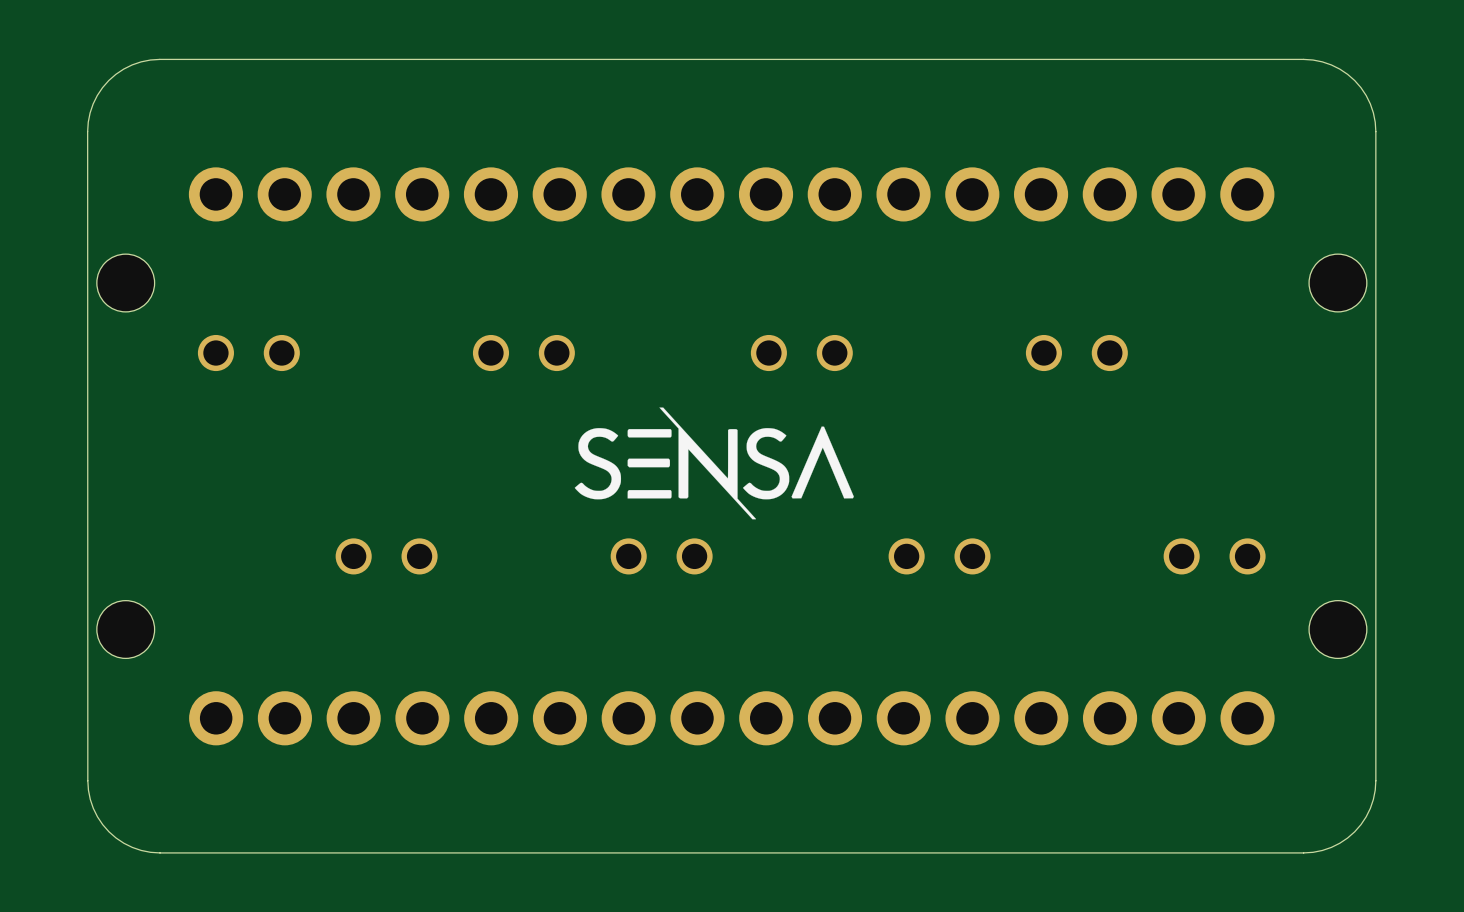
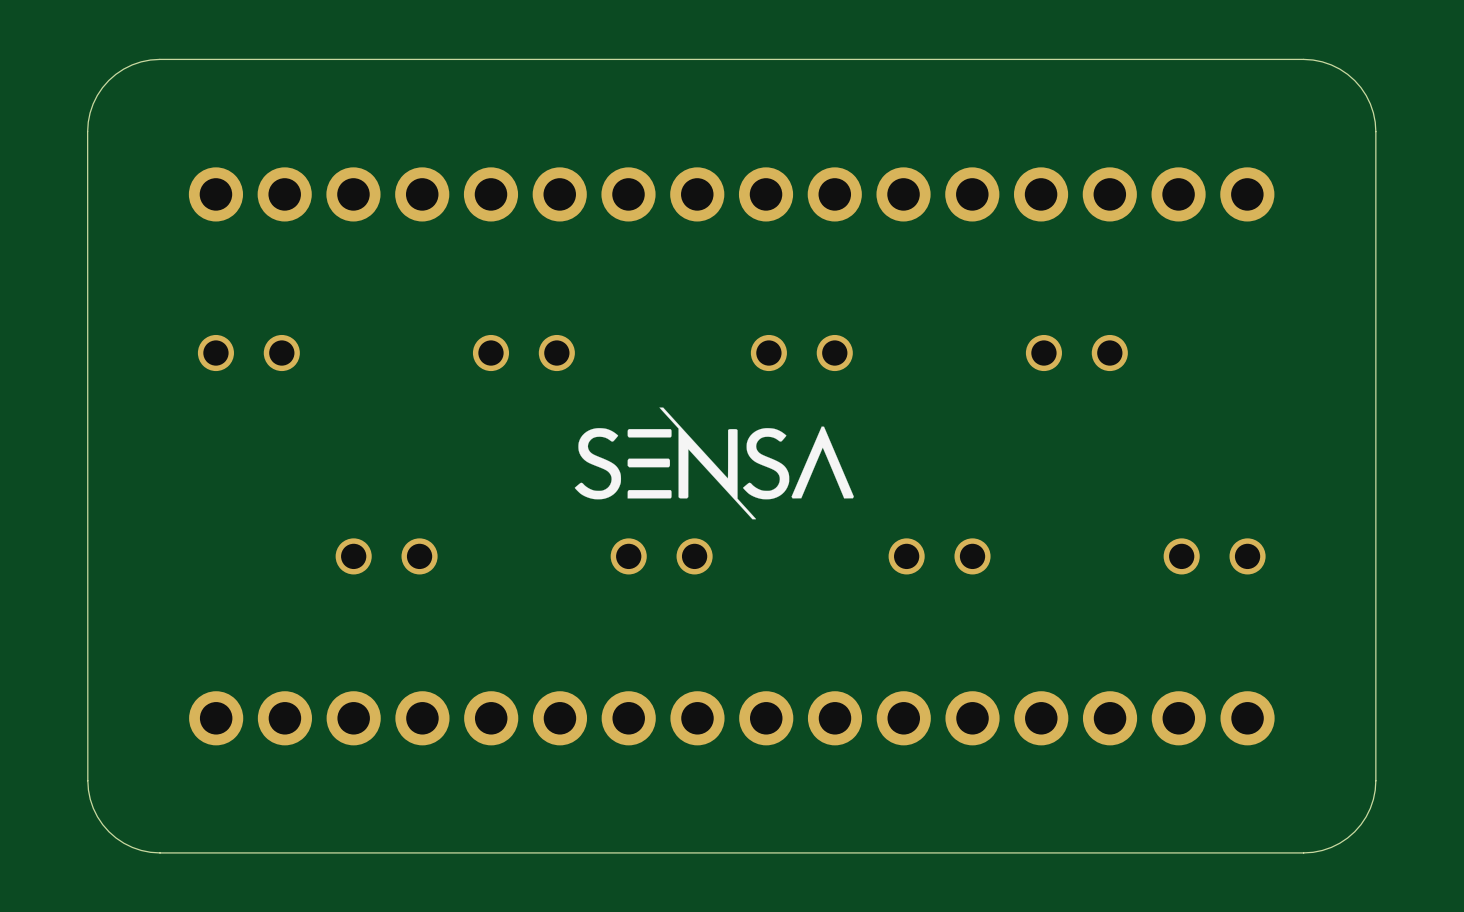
part: (125, 283) -> none
part: (1337, 283) -> none
part: (125, 629) -> none
part: (1337, 629) -> none

